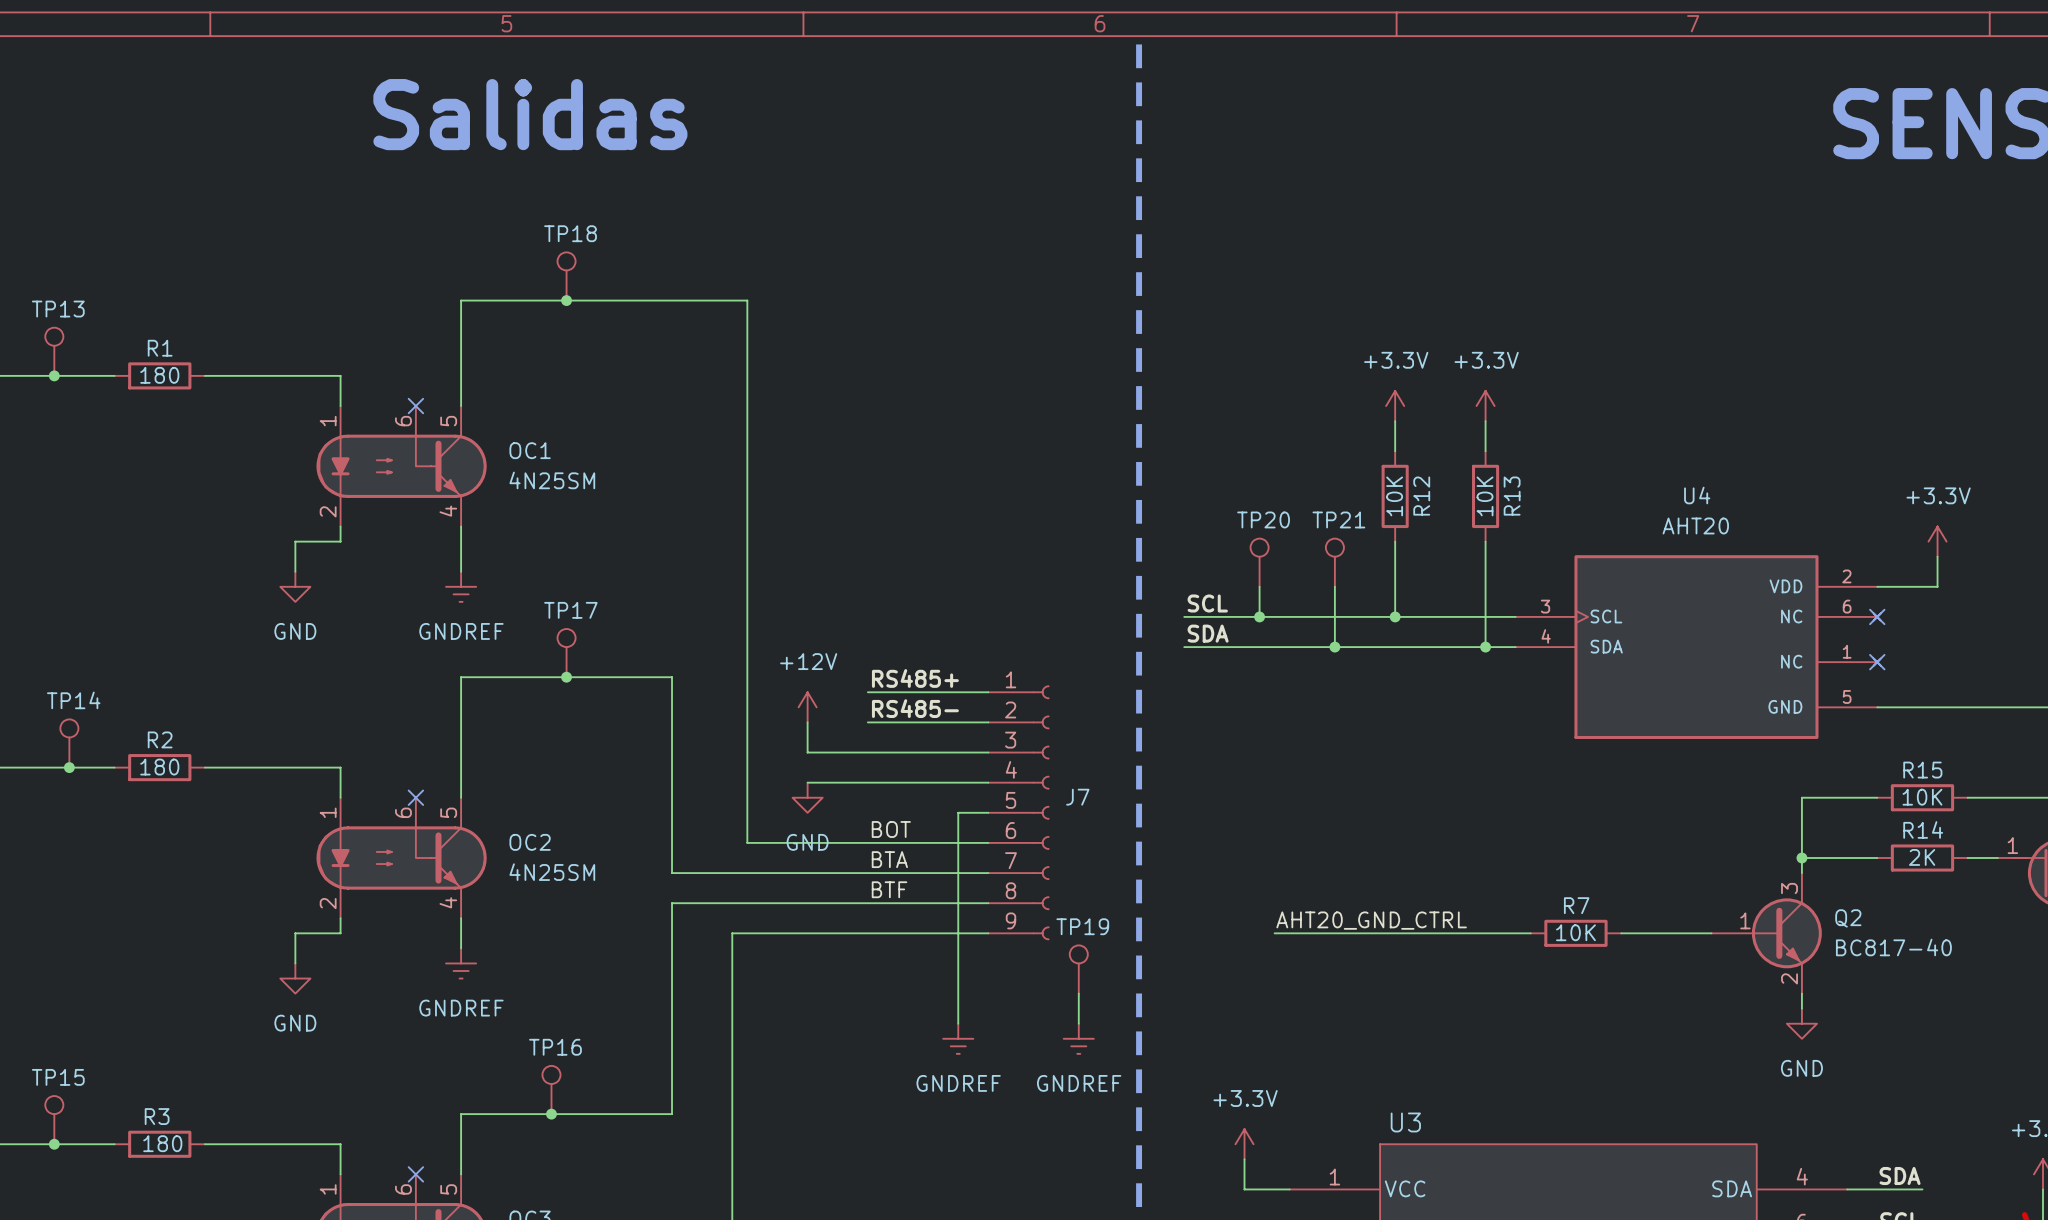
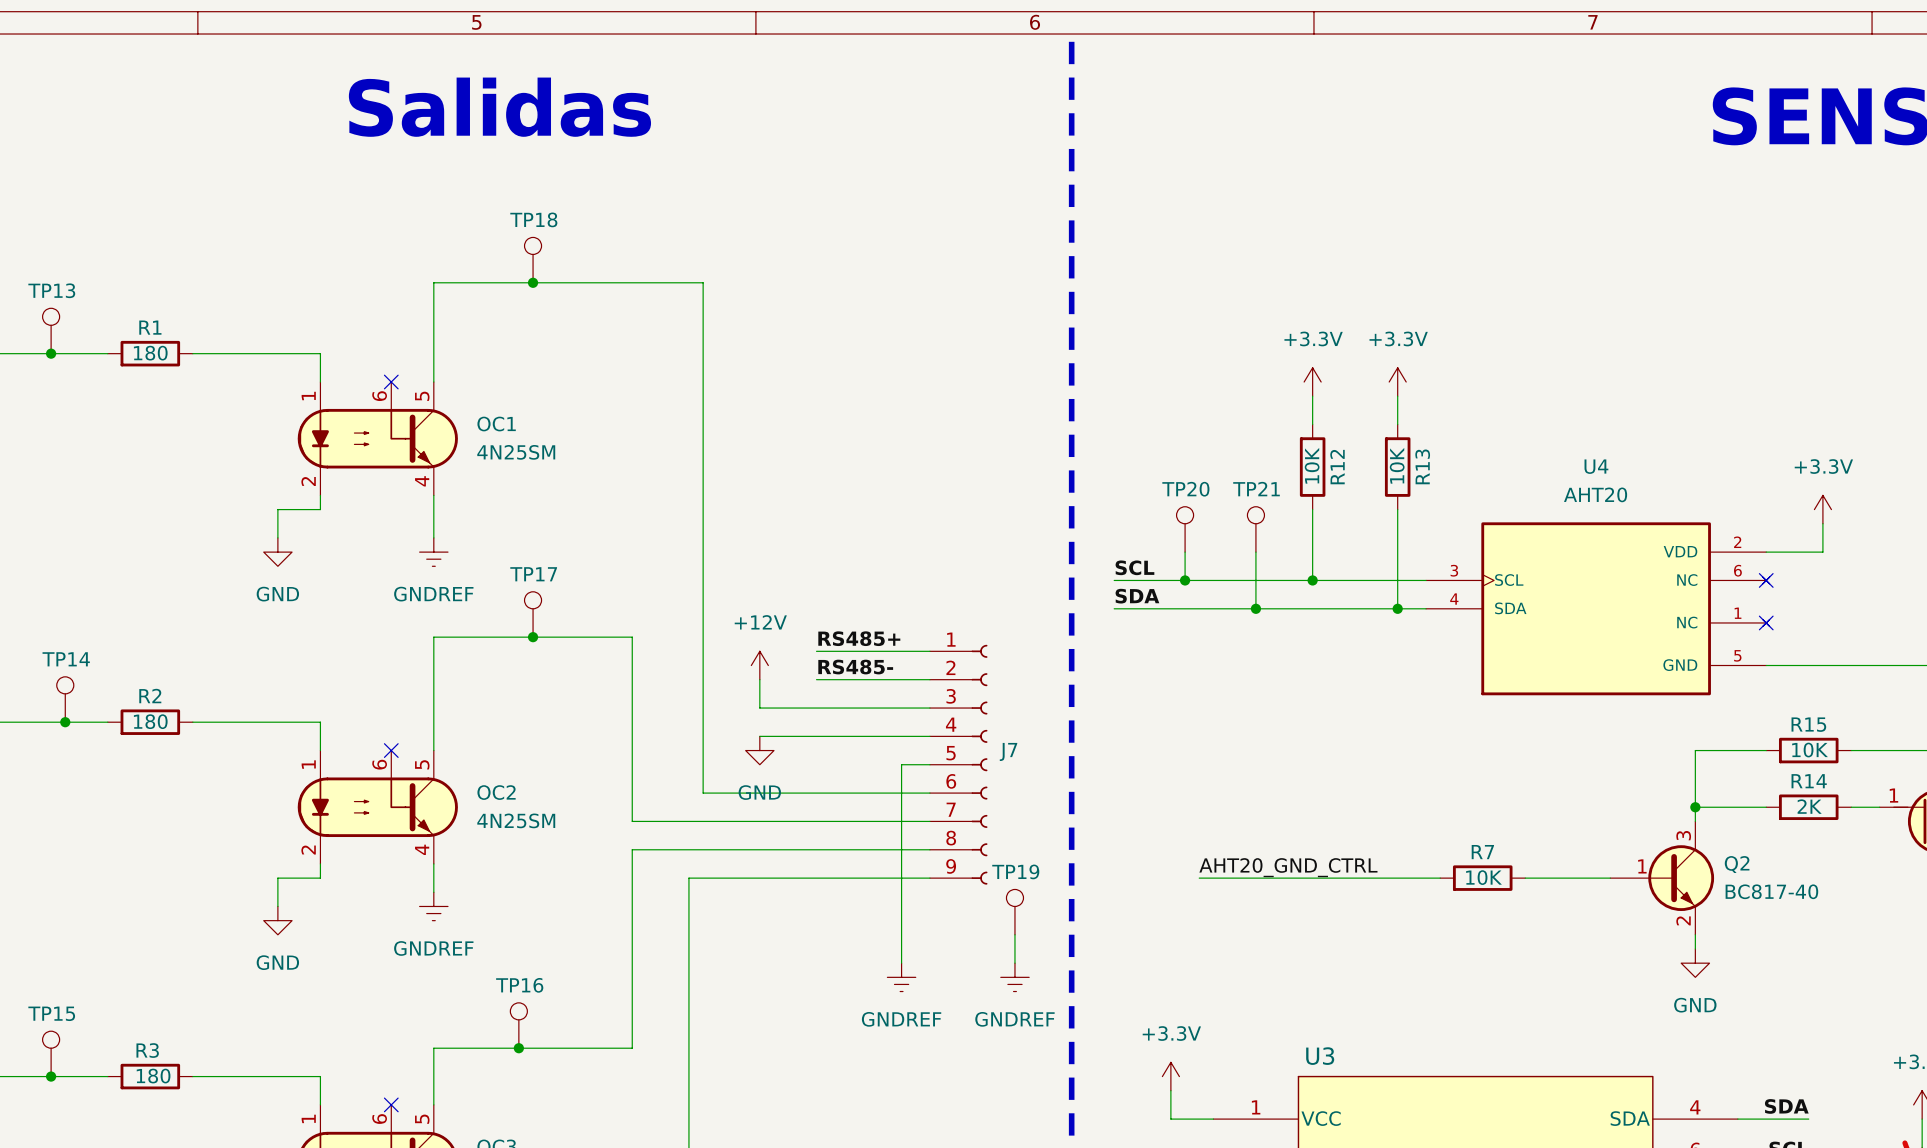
label: BOT (891, 829) -> none
label: BTA (889, 859) -> none
label: BTF (889, 889) -> none

